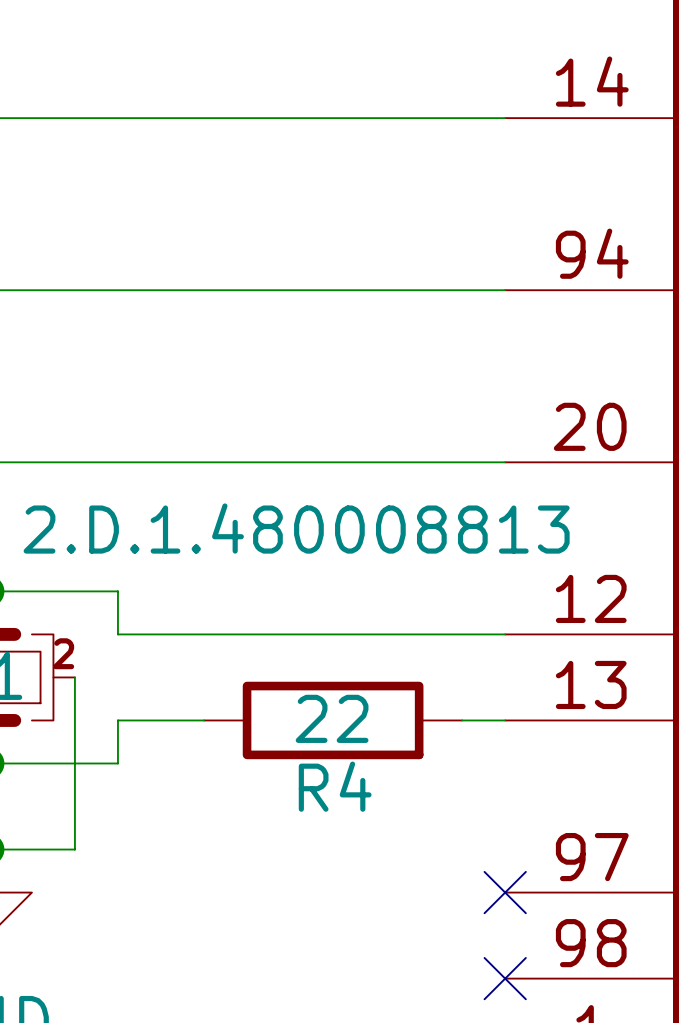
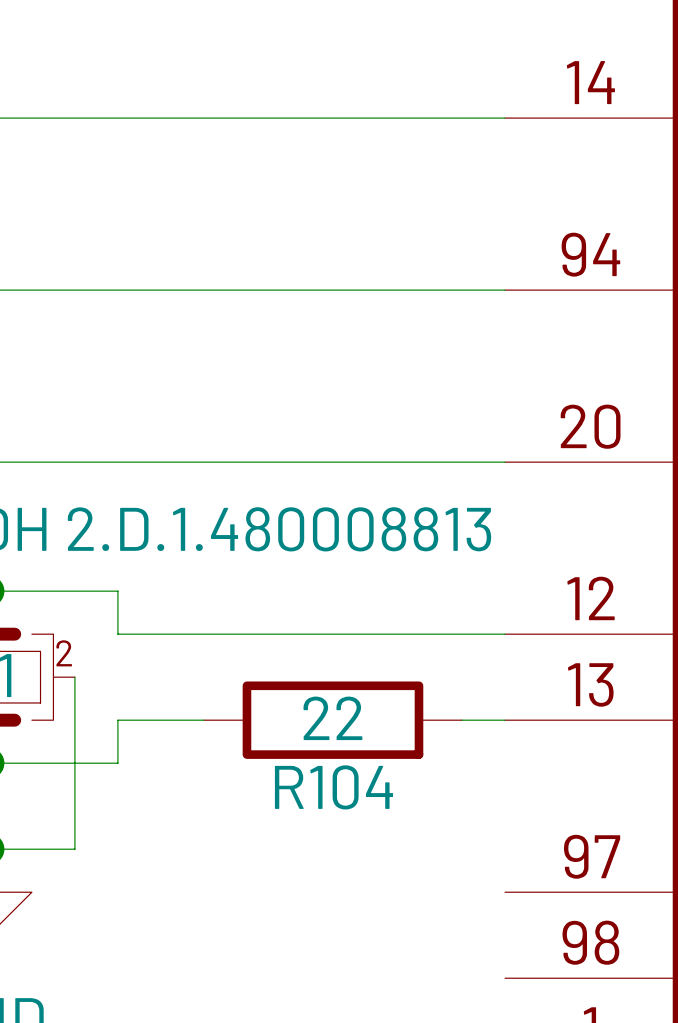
R4 name: R4 (335, 786) -> R104 (333, 787)
no-connect mark: (505, 892) -> none
no-connect mark: (505, 978) -> none

